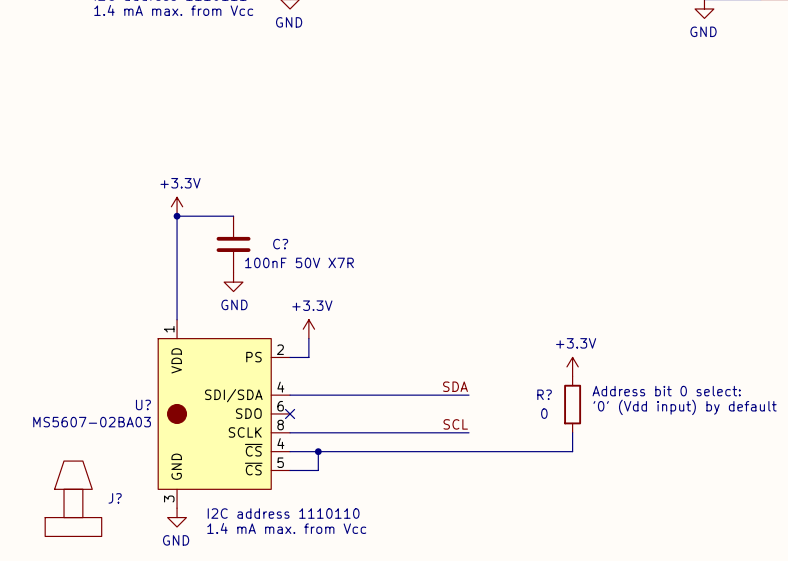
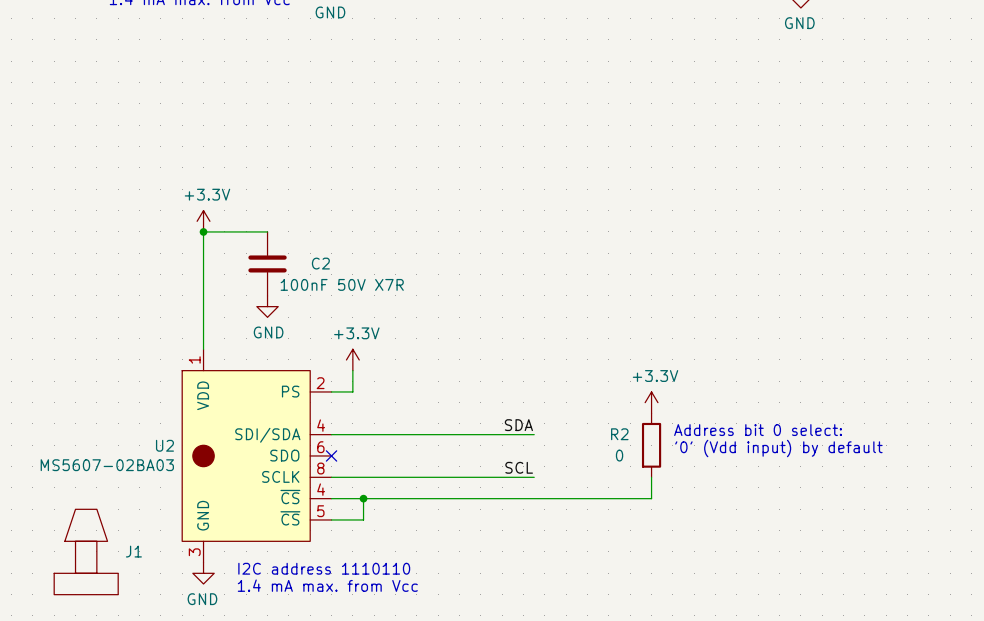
C? name: C? (280, 244) -> C2 (320, 263)
R? name: R? (544, 394) -> R2 (619, 434)
U? name: U? (143, 404) -> U2 (164, 445)
J? name: J? (115, 498) -> J1 (133, 551)

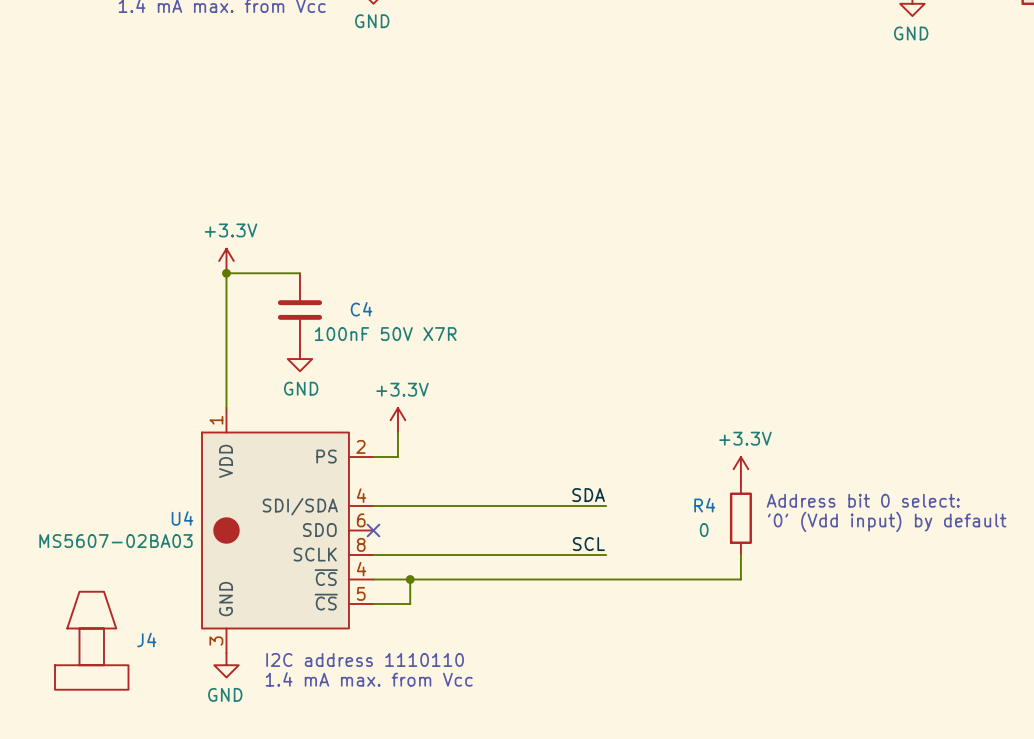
C2 name: C2 (320, 263) -> C4 (361, 309)
R2 name: R2 (619, 434) -> R4 (704, 505)
U2 name: U2 (164, 445) -> U4 (182, 518)
J1 name: J1 (133, 551) -> J4 (146, 639)

